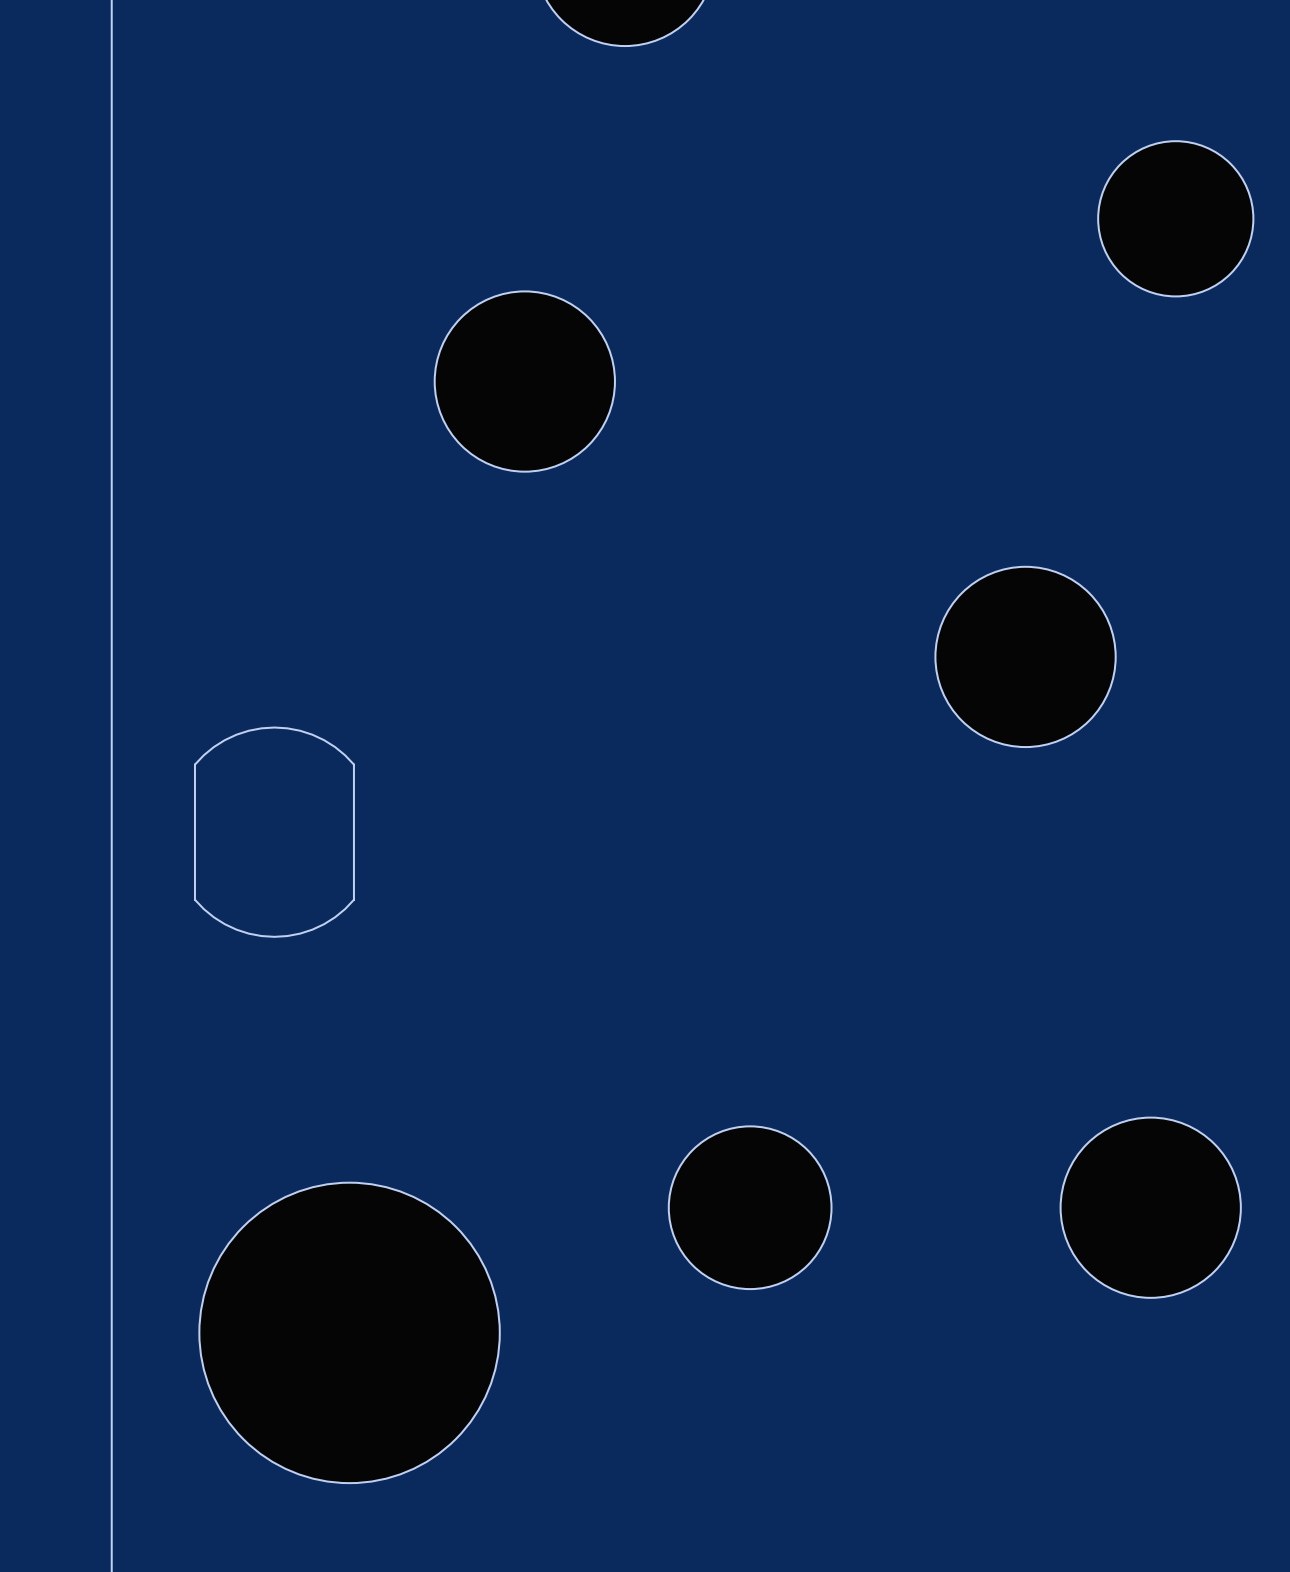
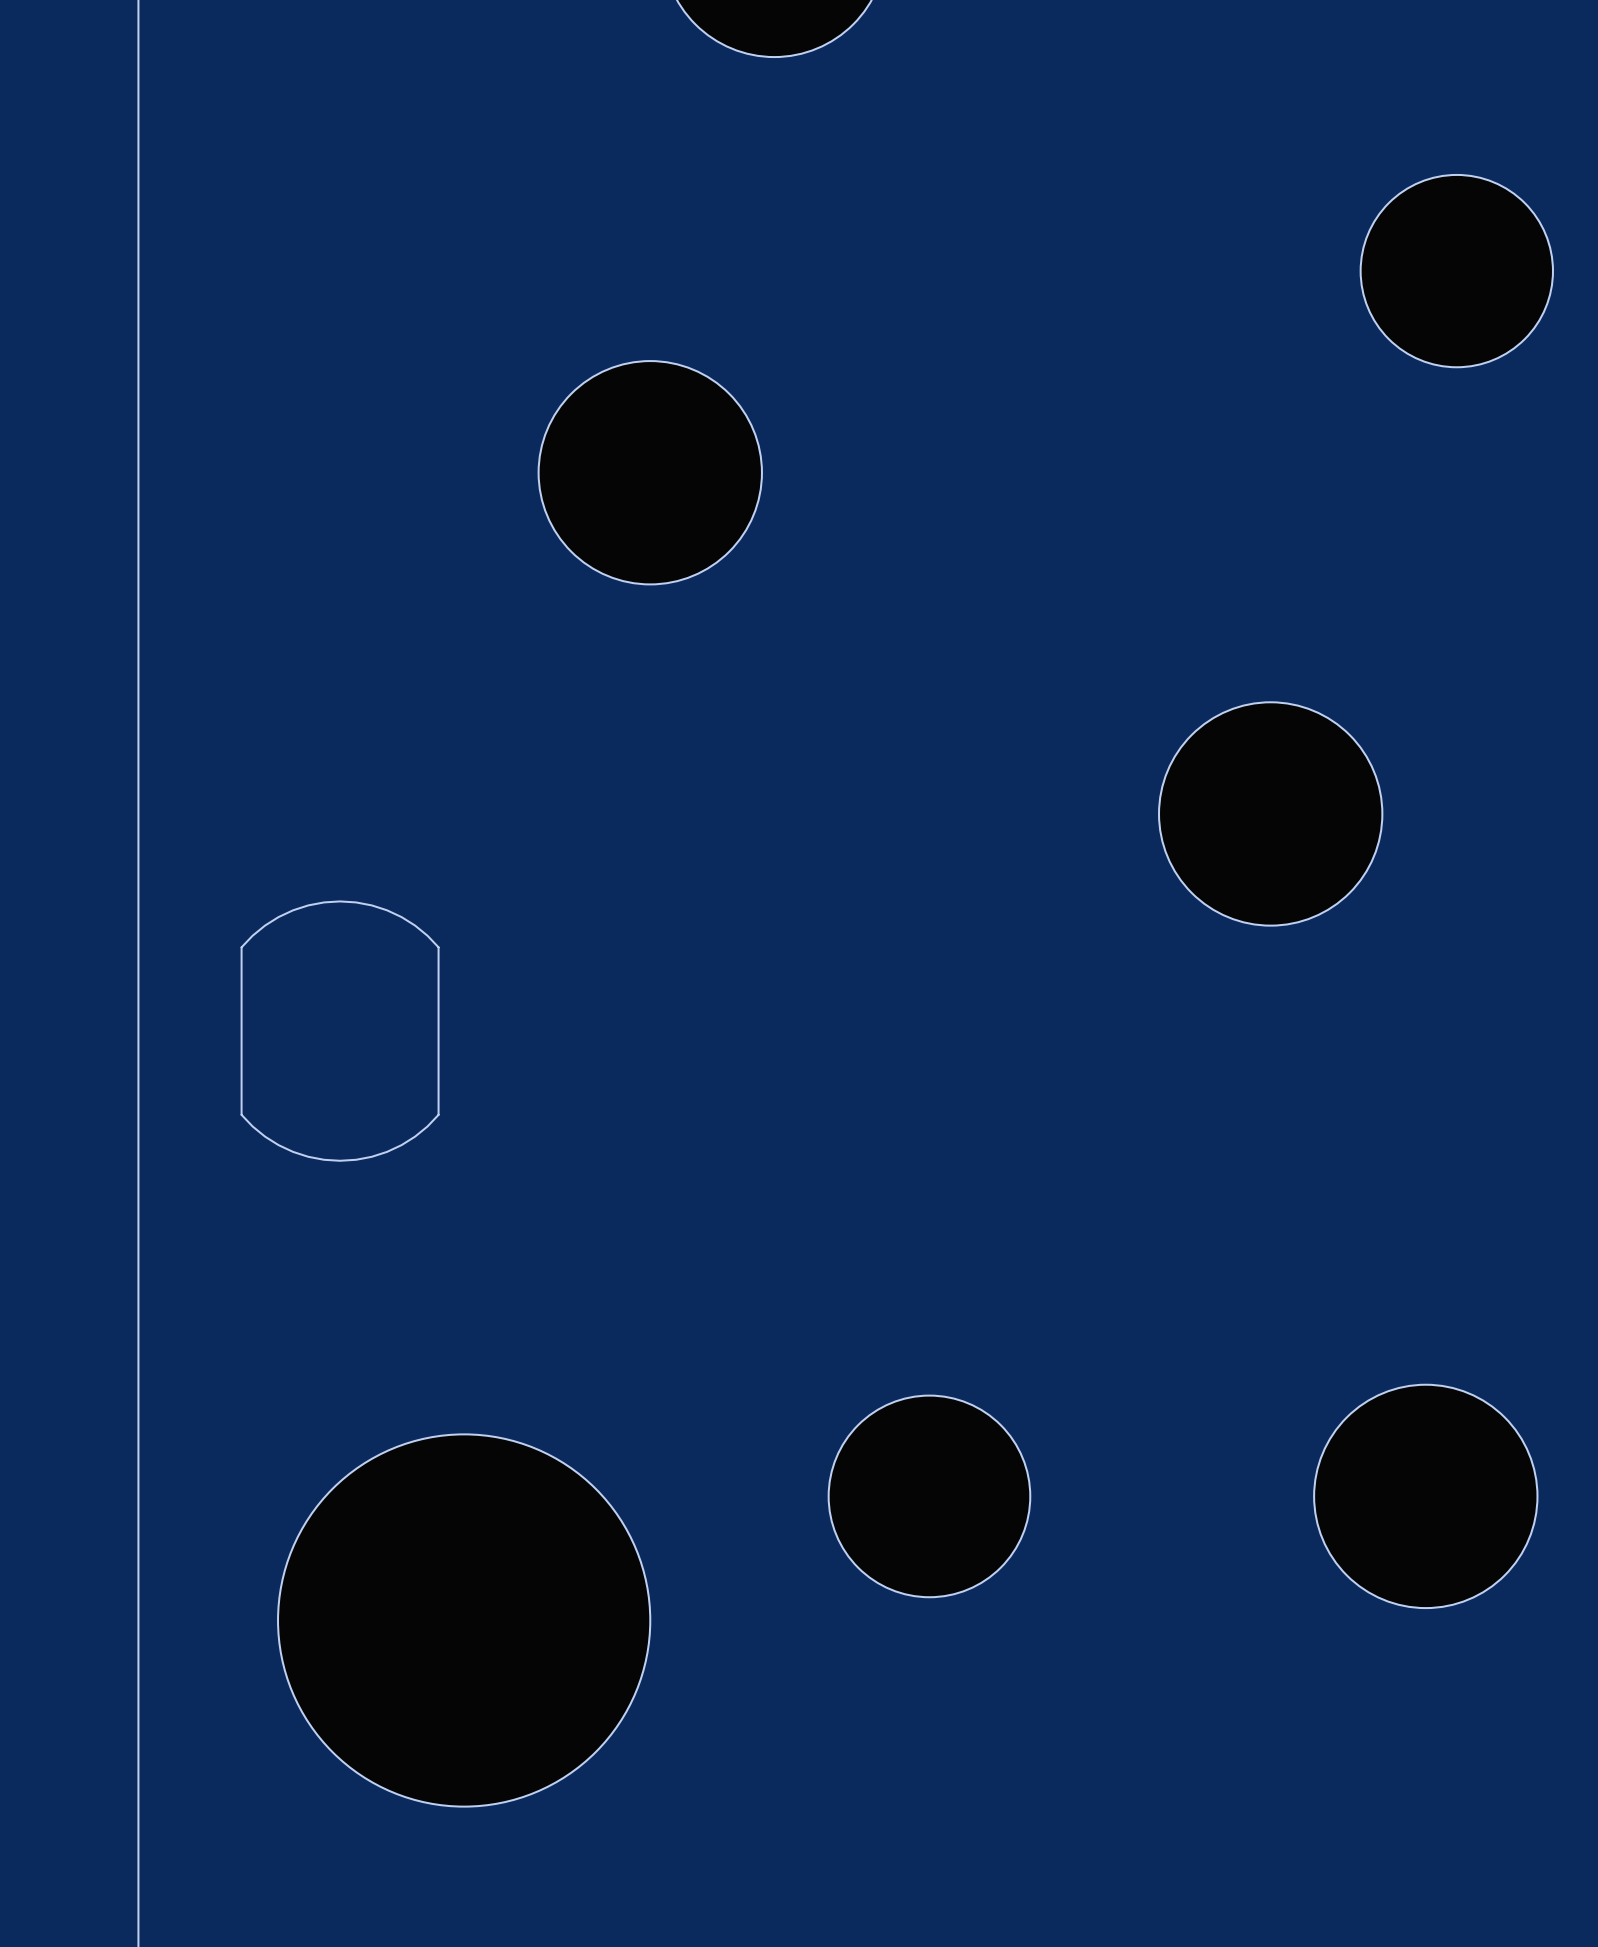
part position: (349, 1332) -> (464, 1620)

